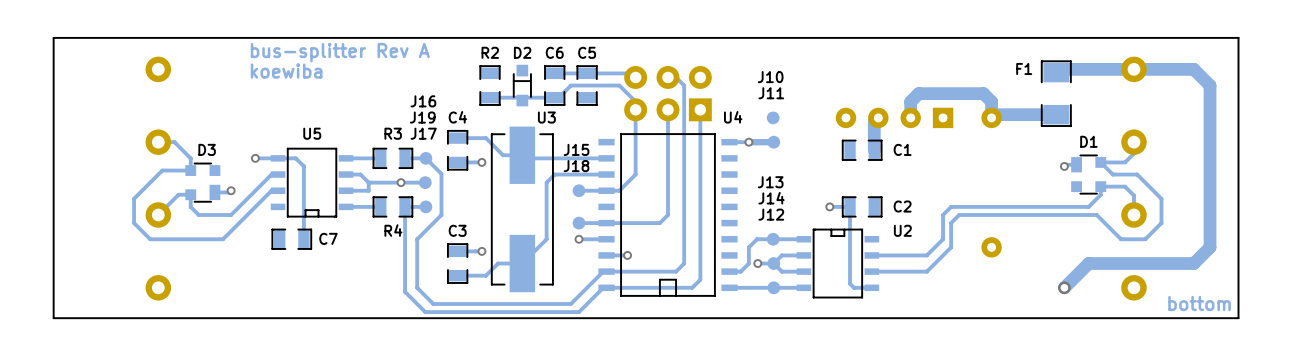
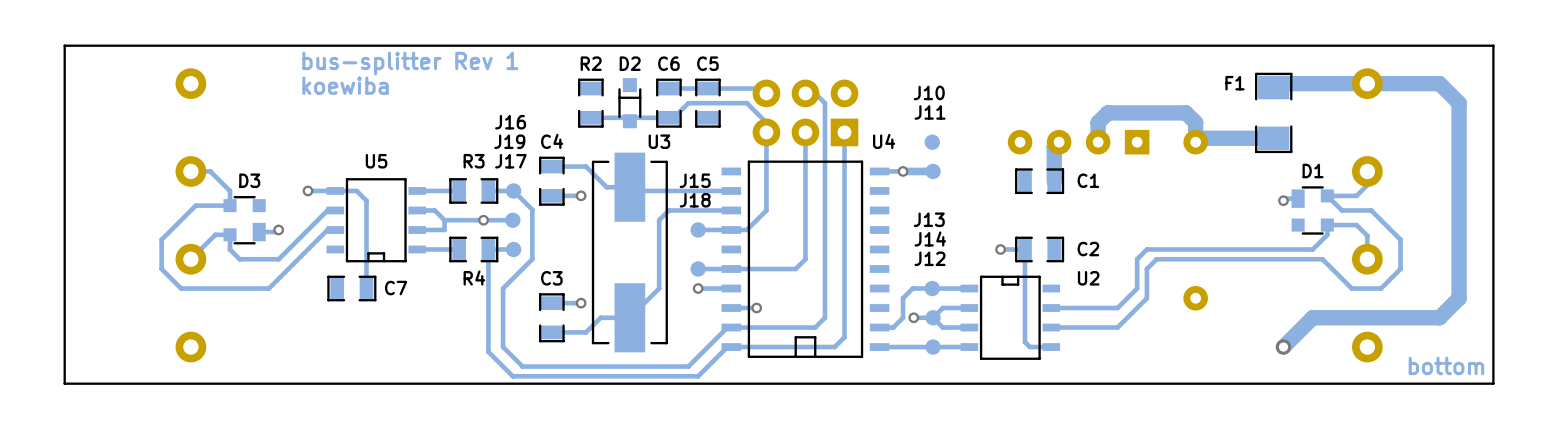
text: bus-splitter Rev A (340, 52) -> bus-splitter Rev 1 (410, 63)

